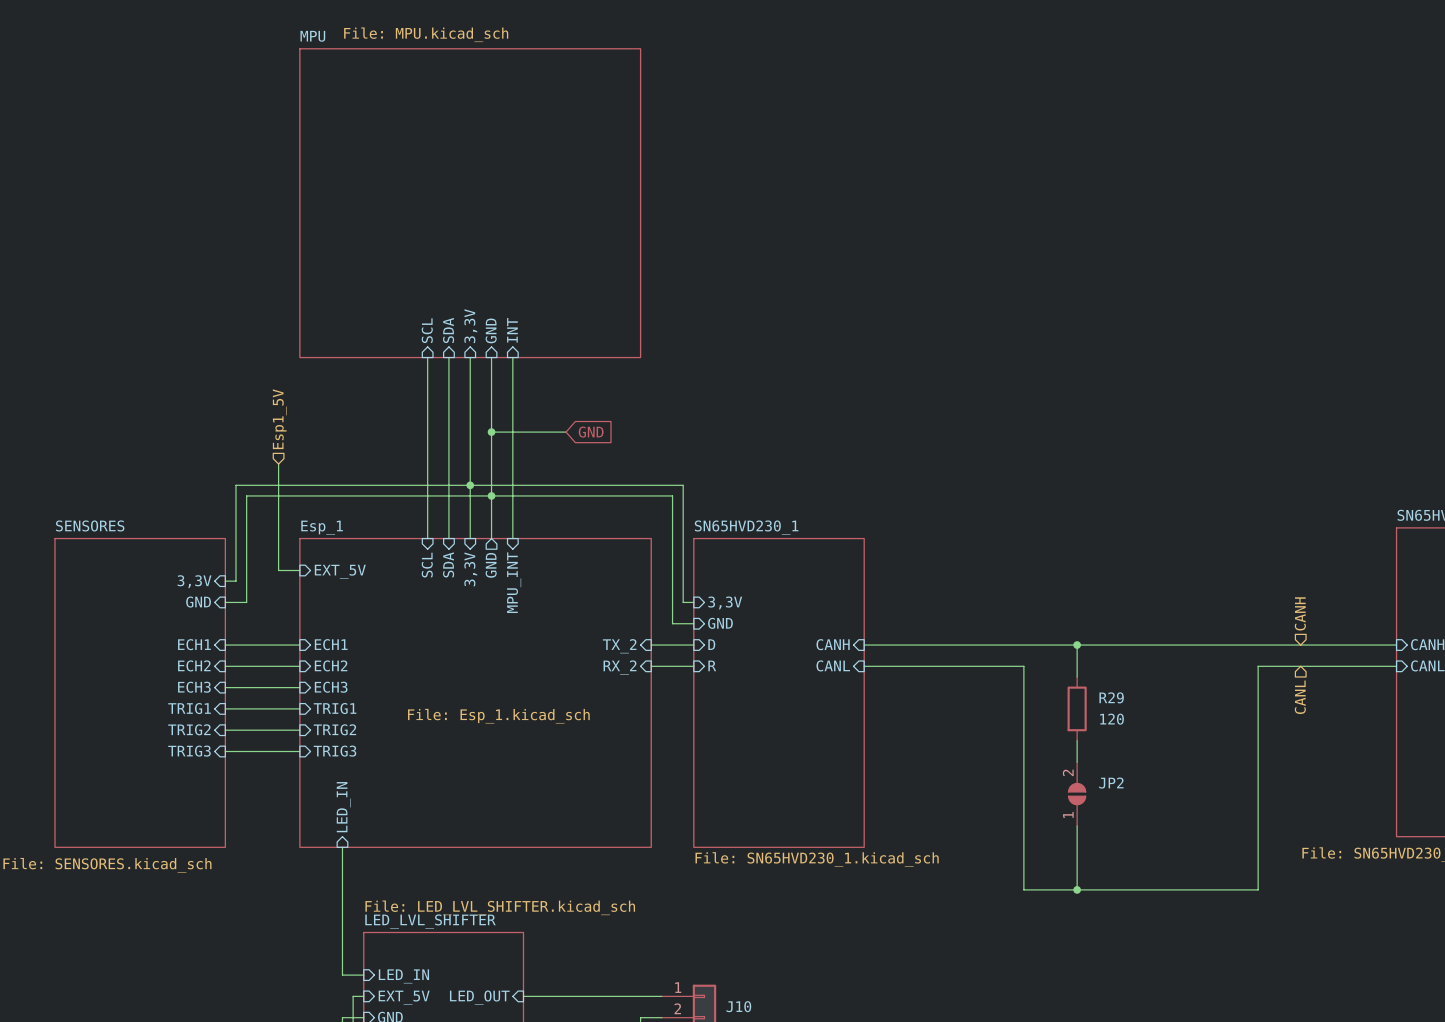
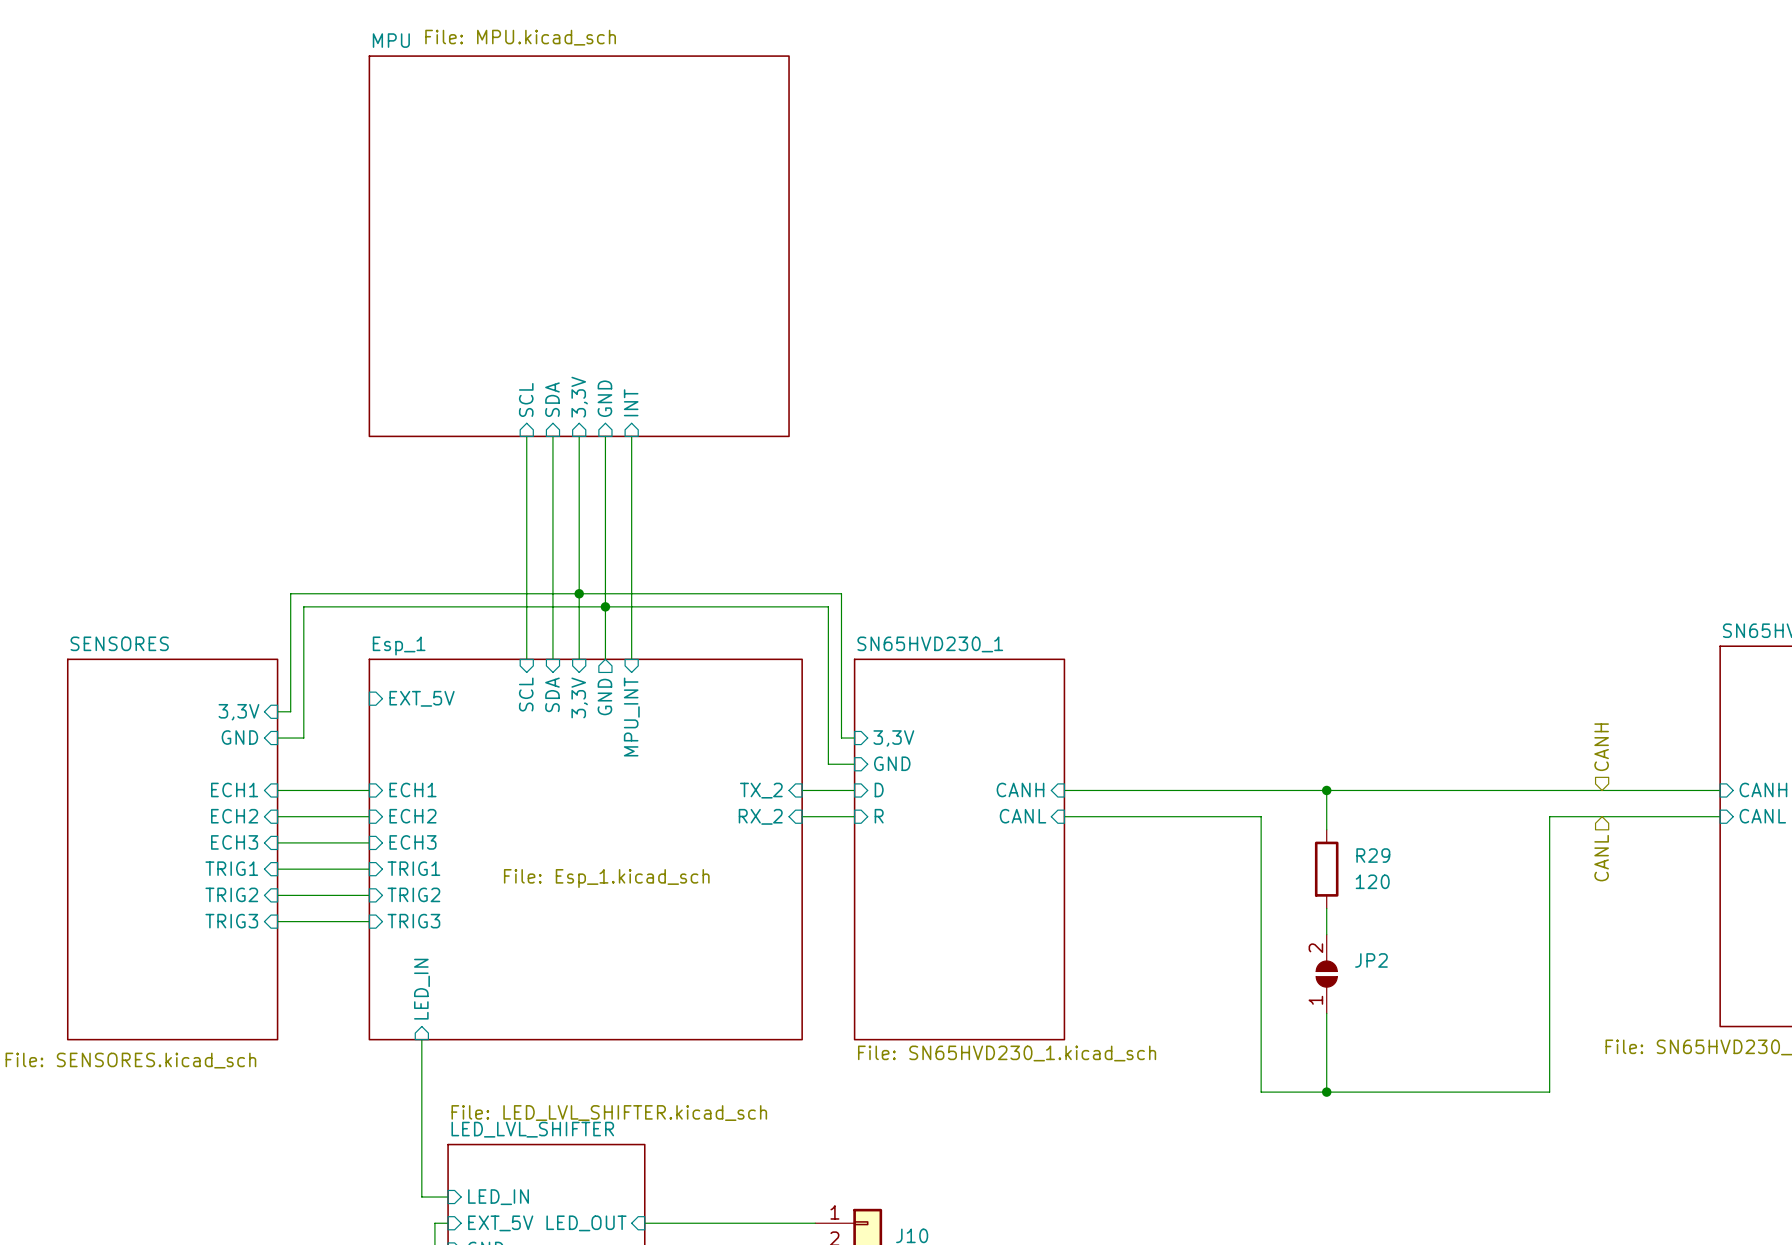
hierarchical label: Esp1_5V (279, 419) -> none
wire: (491, 432) (566, 432) -> none
junction: (491, 432) -> none
global label: GND (591, 432) -> none
wire: (278, 464) (278, 570) (299, 570) -> none

